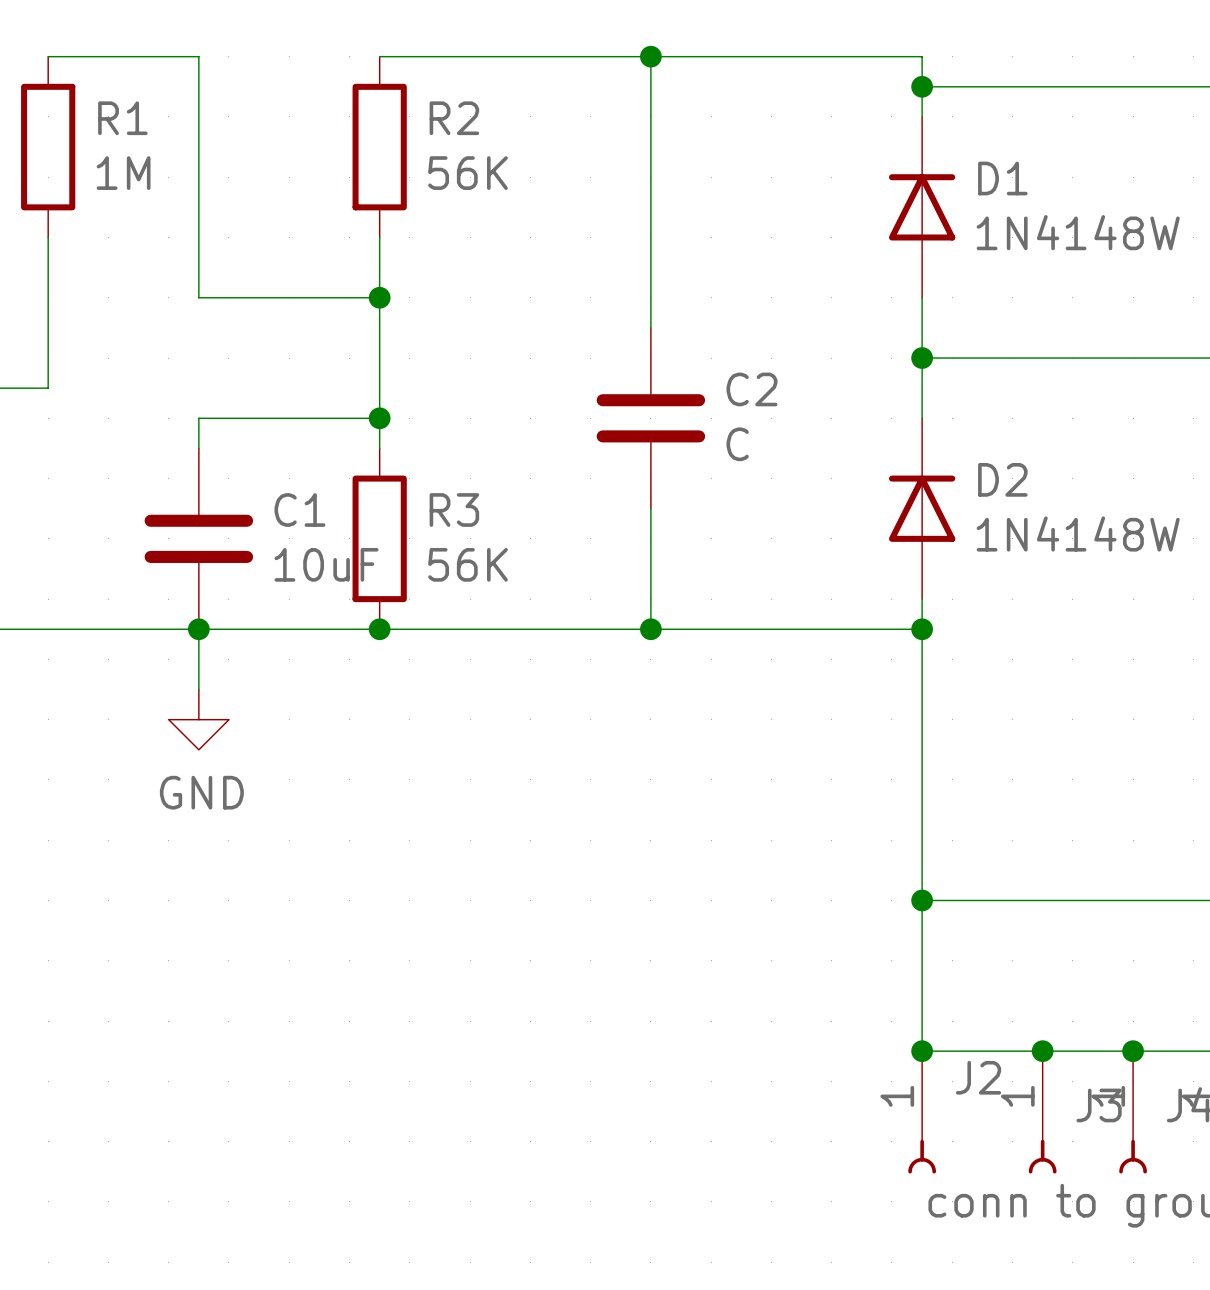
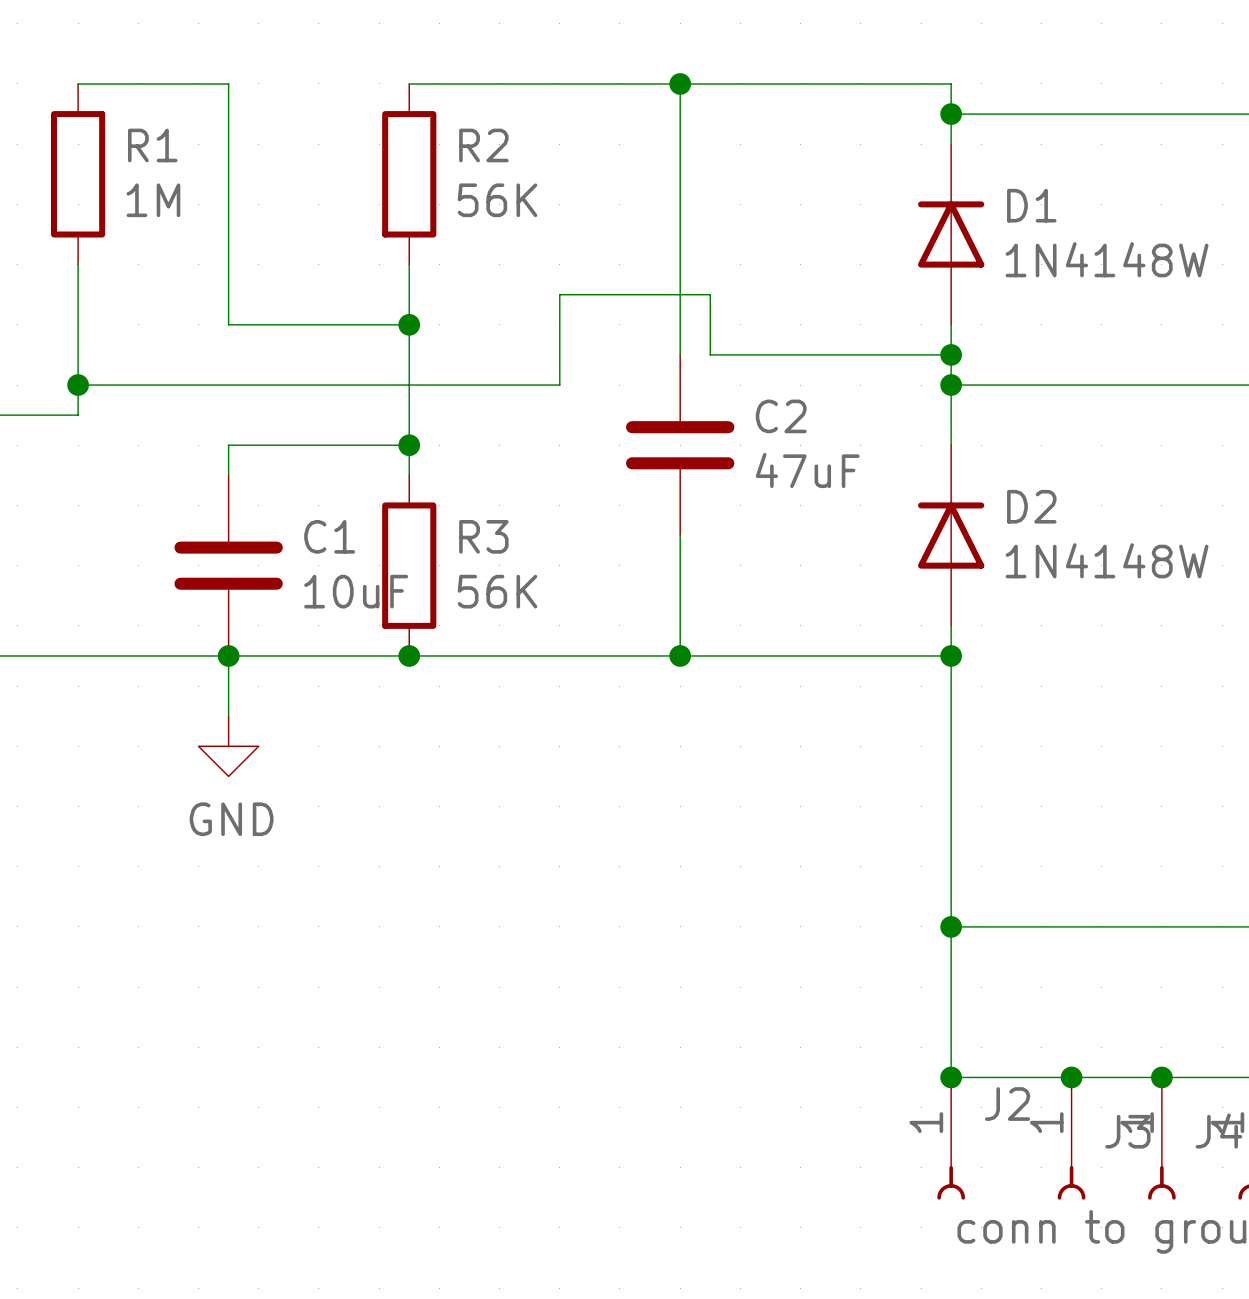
wire: none -> (951, 354) (710, 354) (710, 294) (559, 294) (559, 385) (78, 385)
junction: none -> (951, 354)
junction: none -> (78, 385)
C2 value: C (737, 444) -> 47uF (807, 470)

